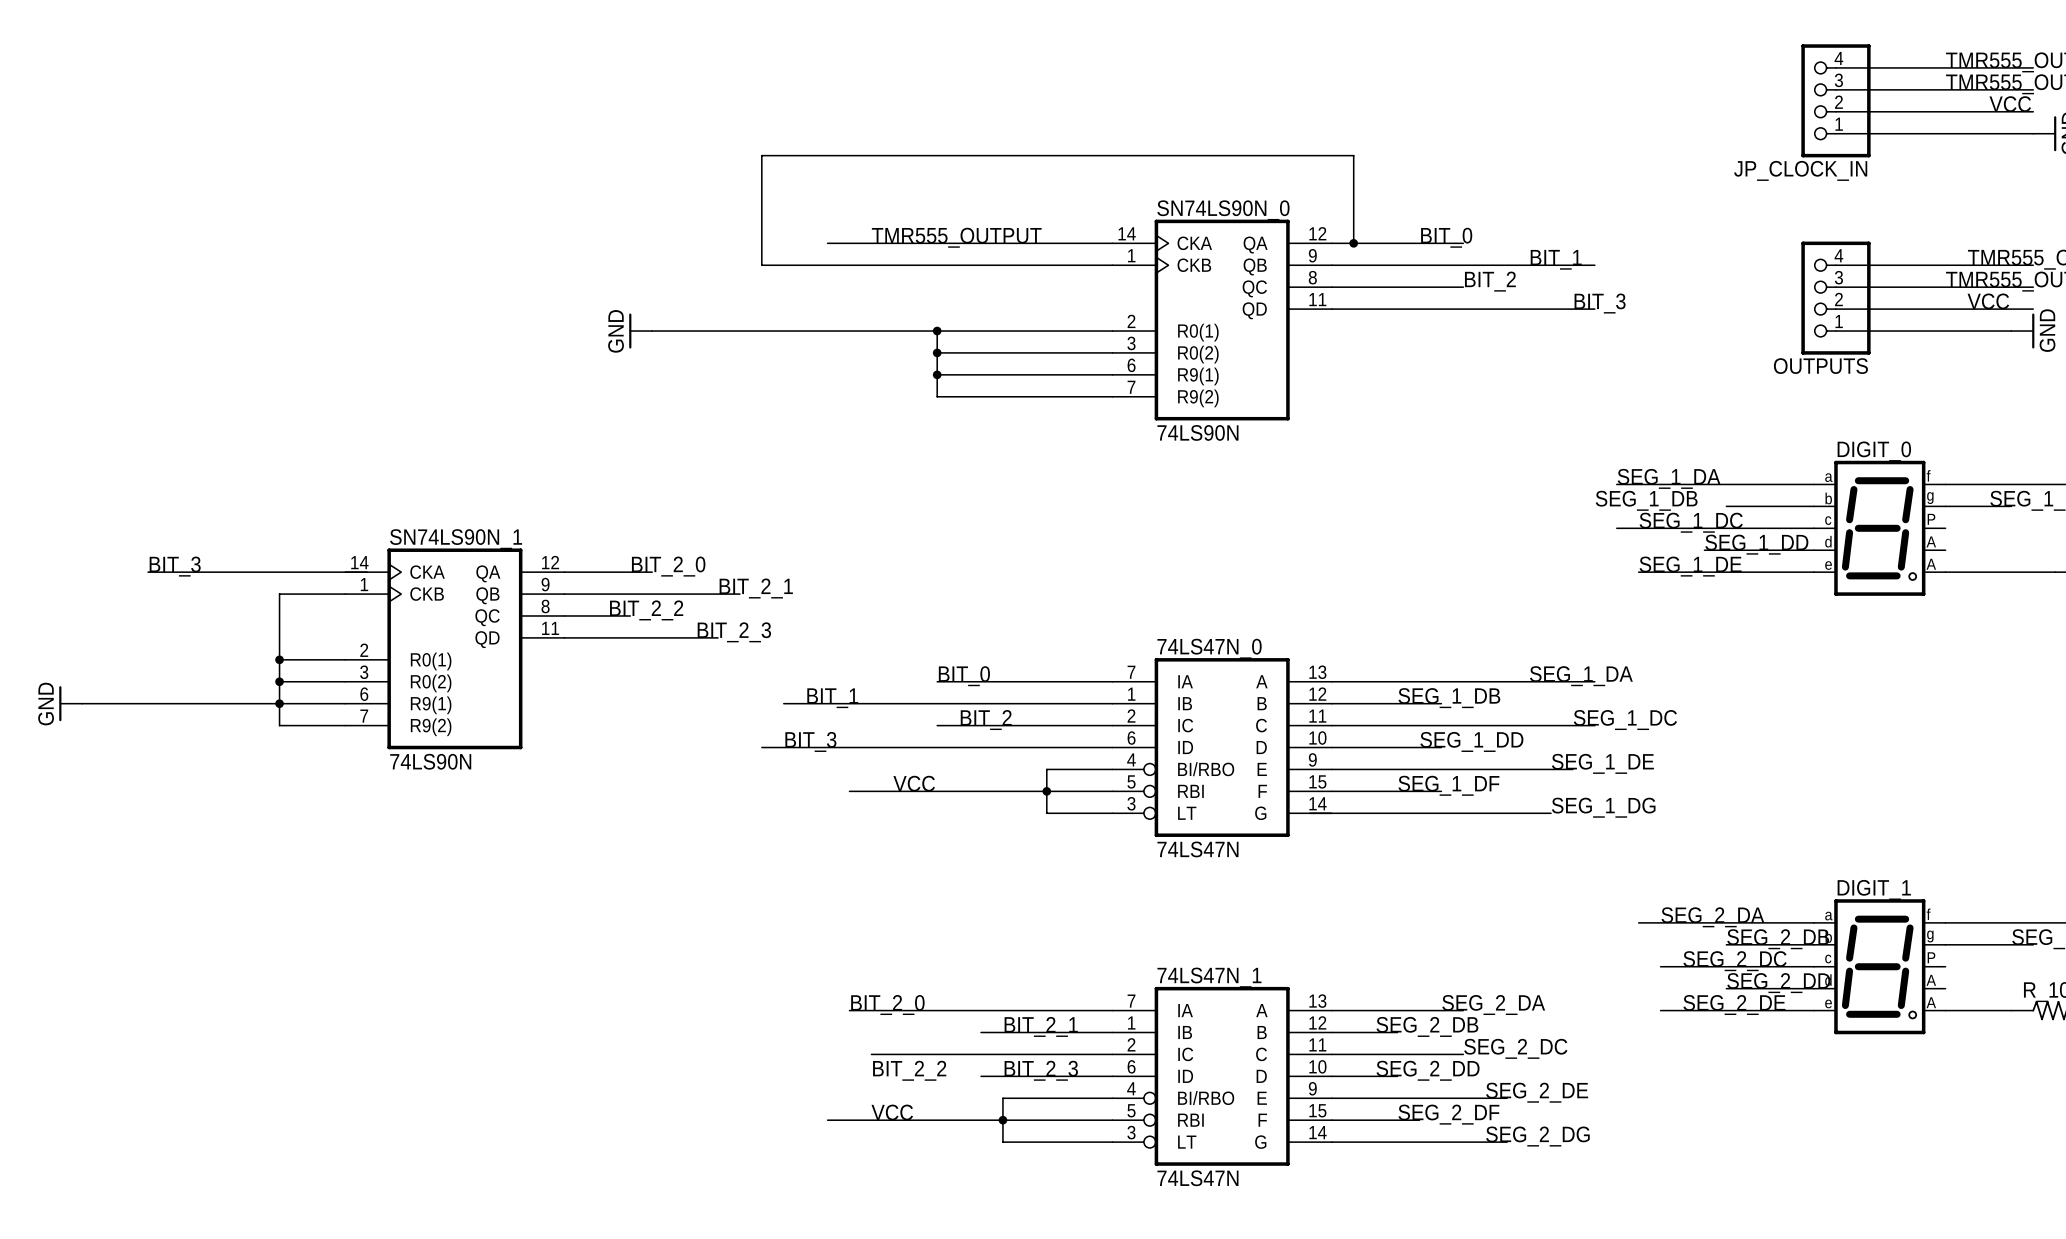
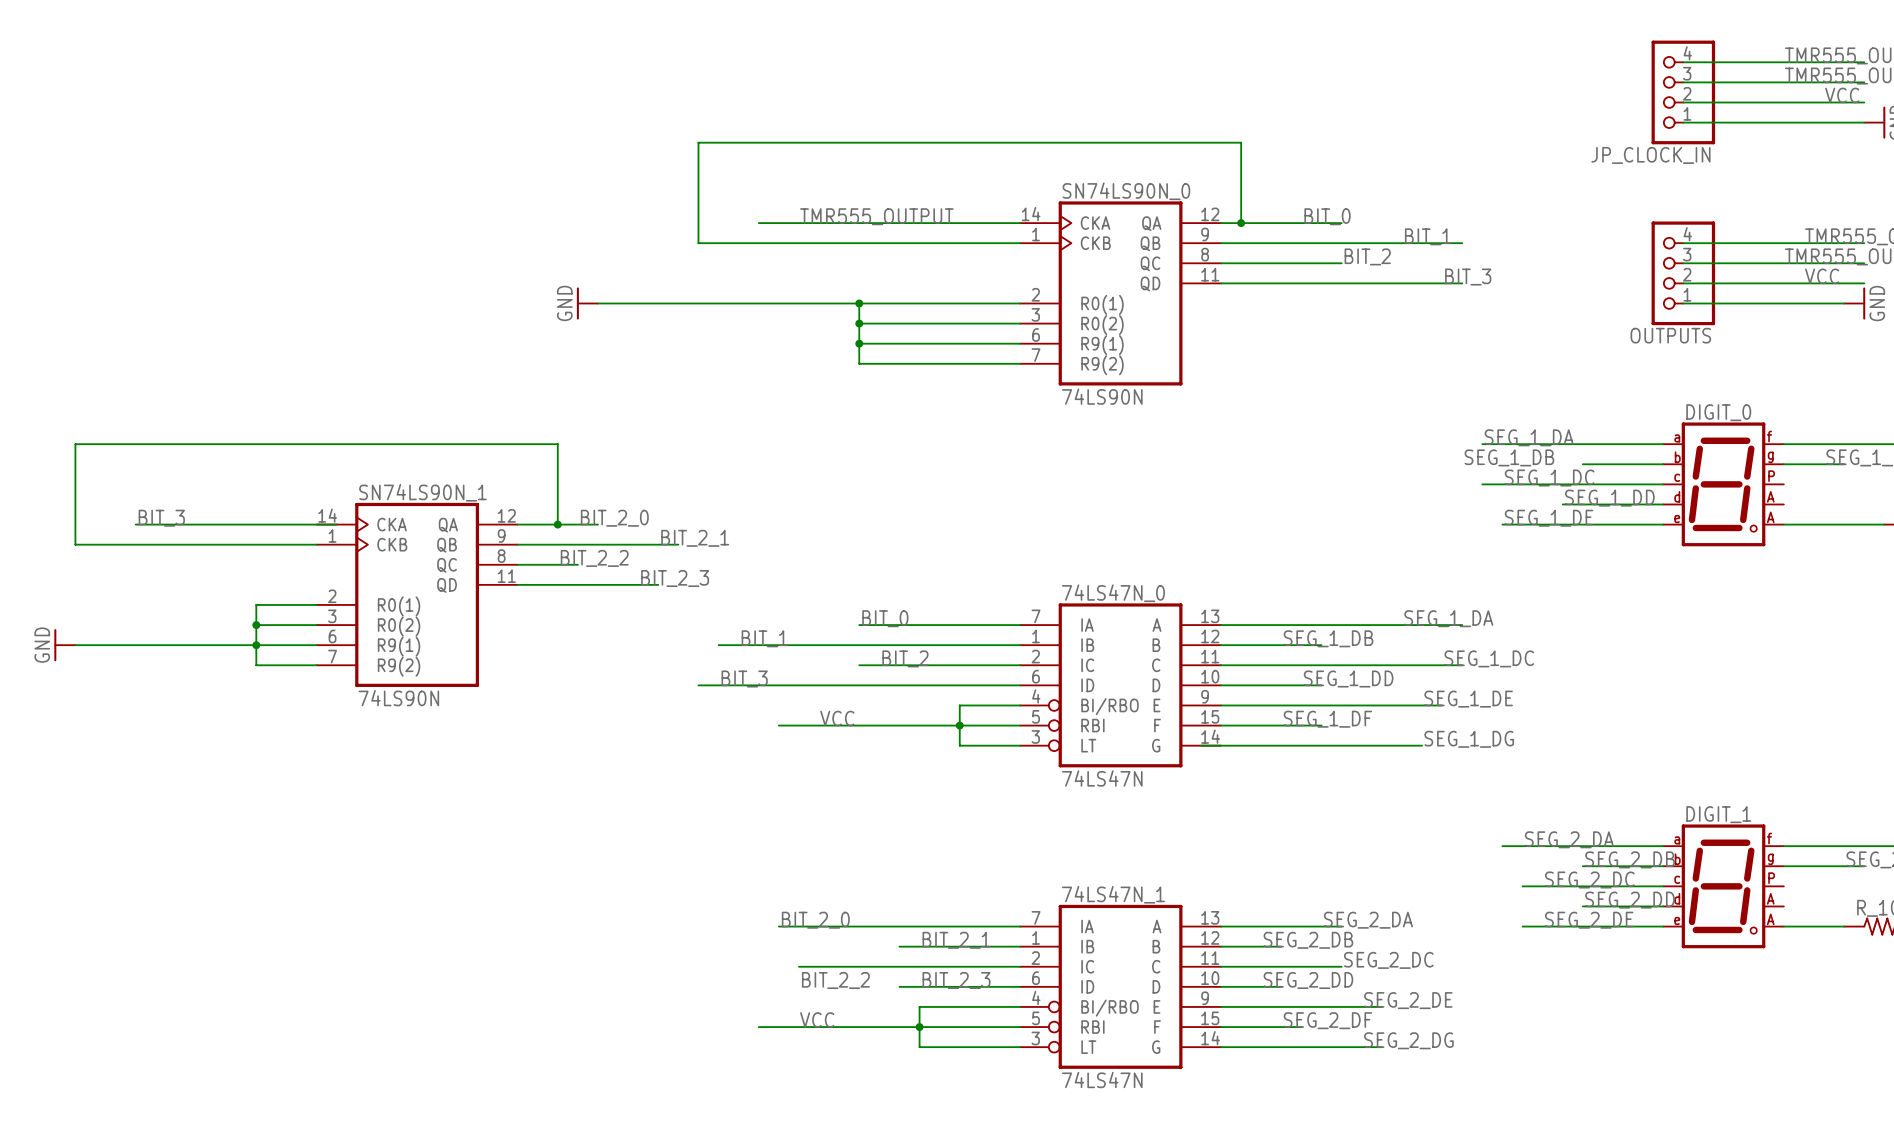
junction: none -> (557, 524)
wire: (279, 594) (279, 659) -> (256, 544) (75, 544) (75, 444) (557, 444) (557, 524)
junction: (279, 659) -> none

